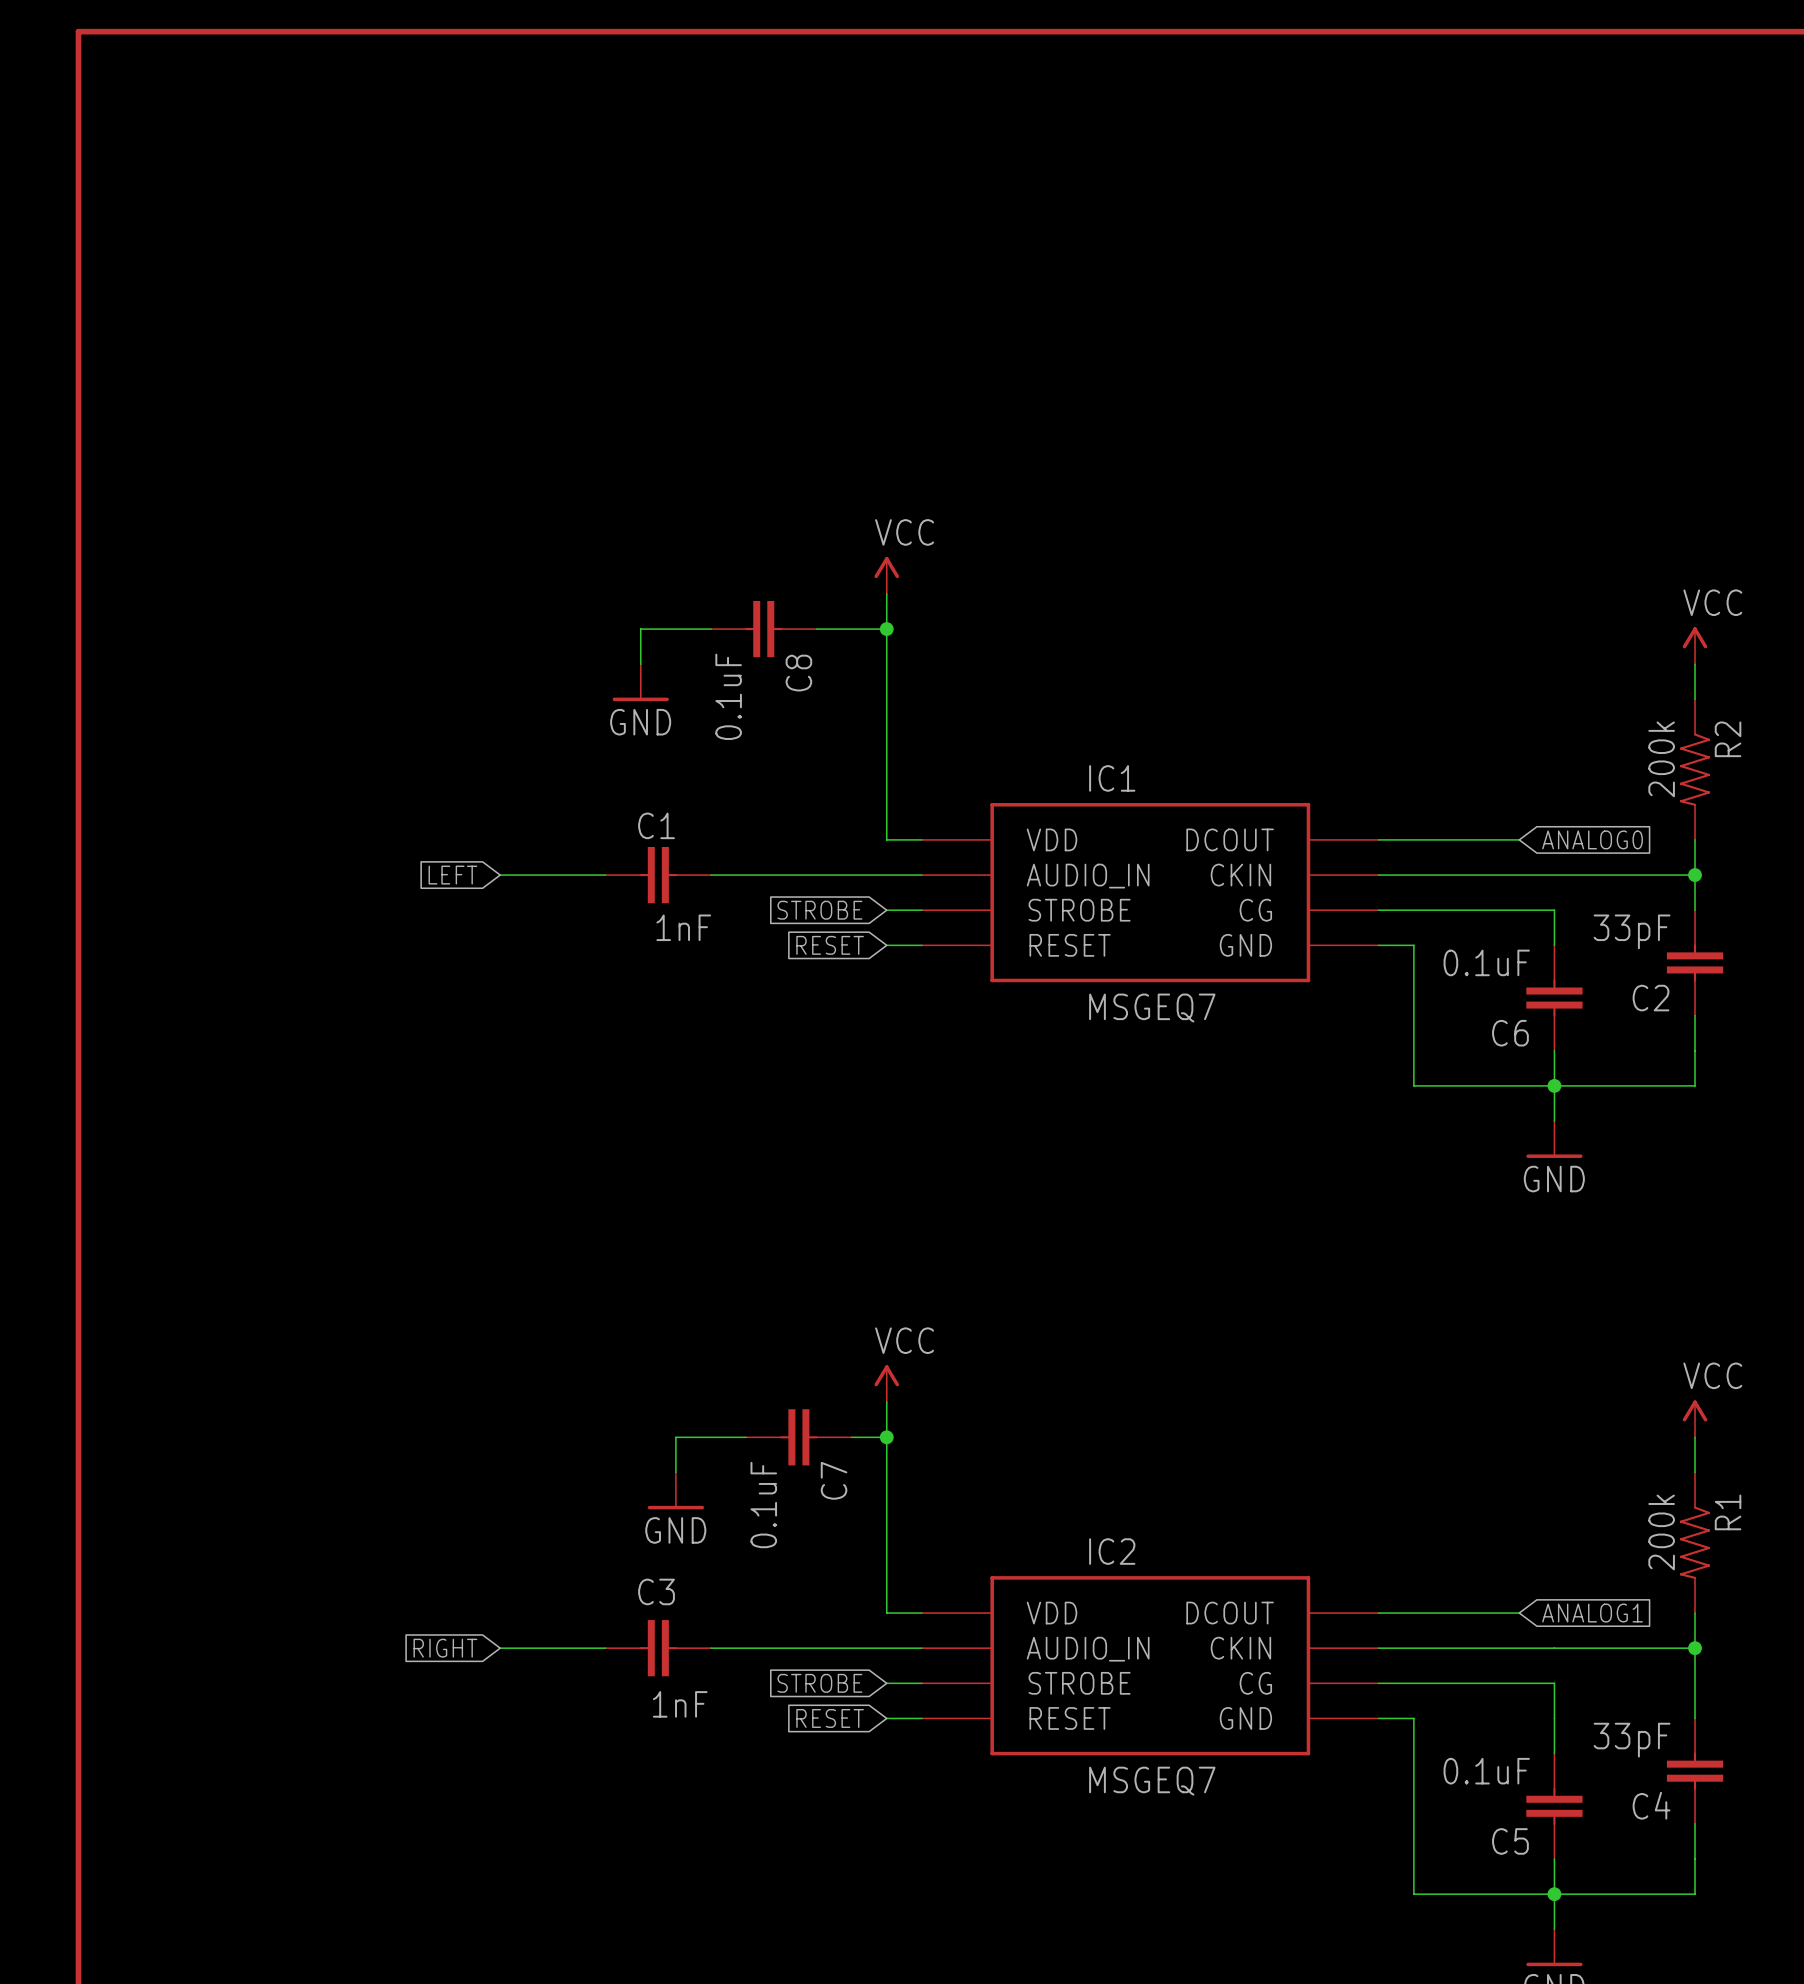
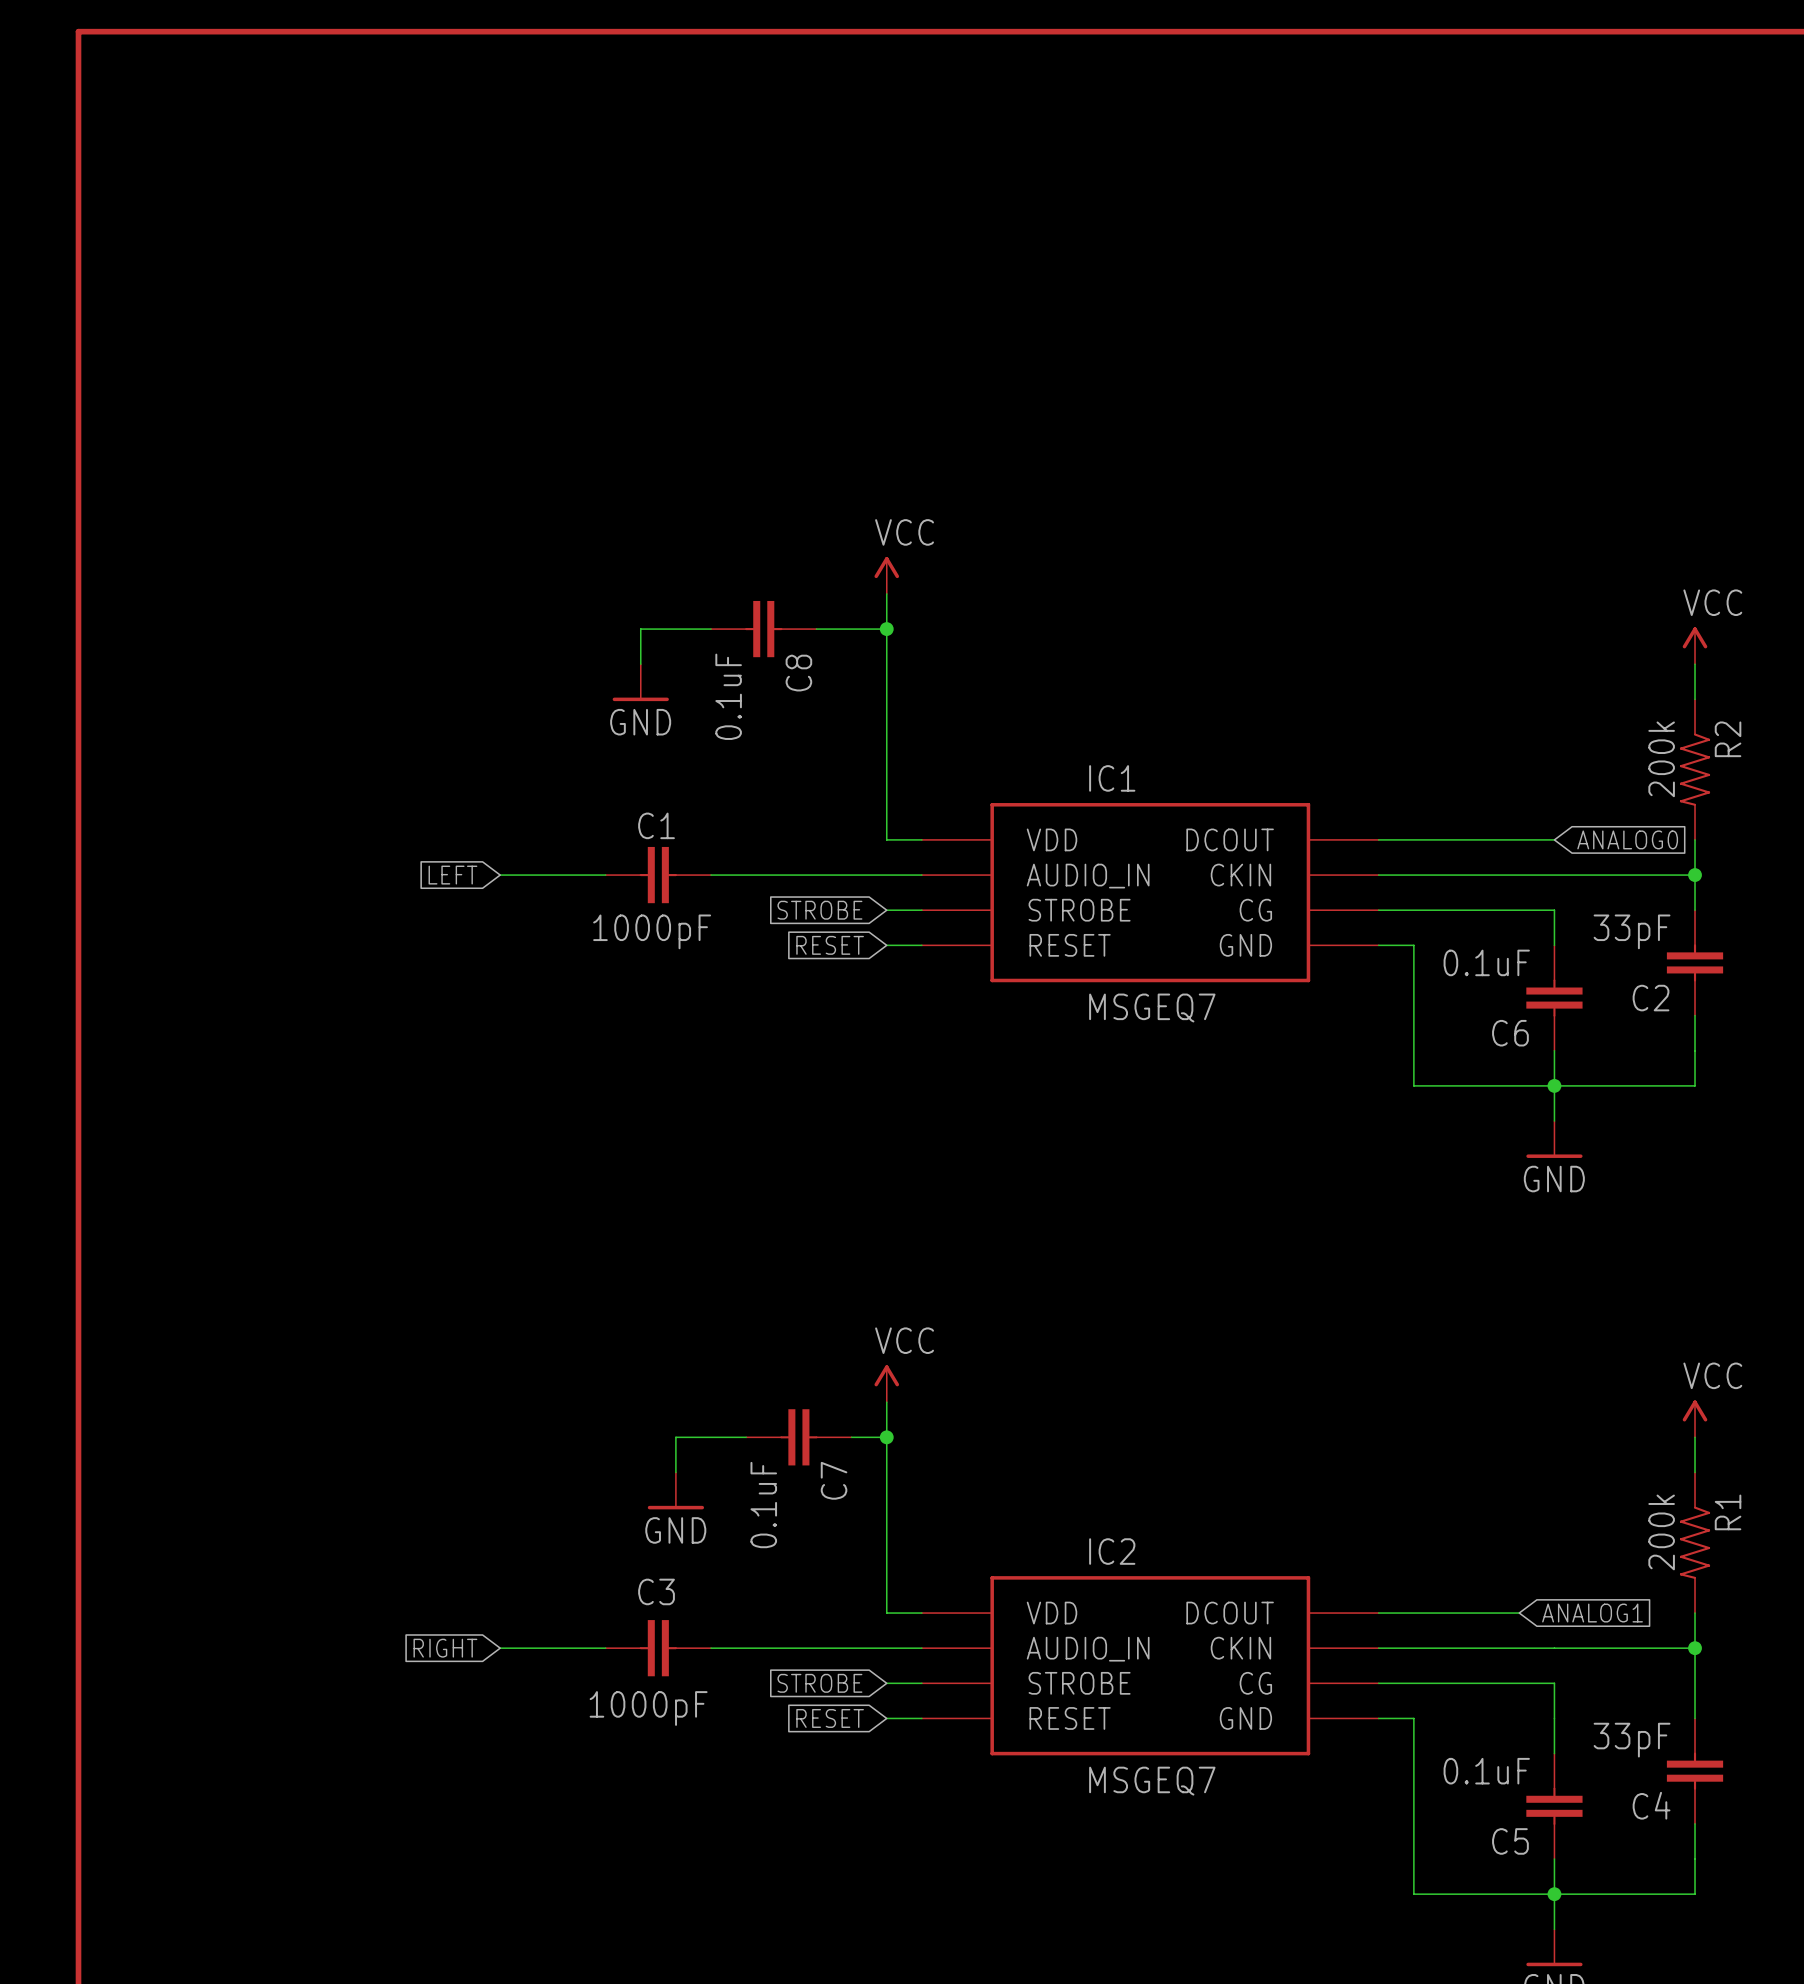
wire: none -> (1519, 839) (1554, 839)
global label position: ANALOG0 (1592, 839) -> ANALOG0 (1627, 839)
C1 value: 1nF (683, 927) -> 1000pF (652, 931)
C3 value: 1nF (680, 1704) -> 1000pF (648, 1708)

